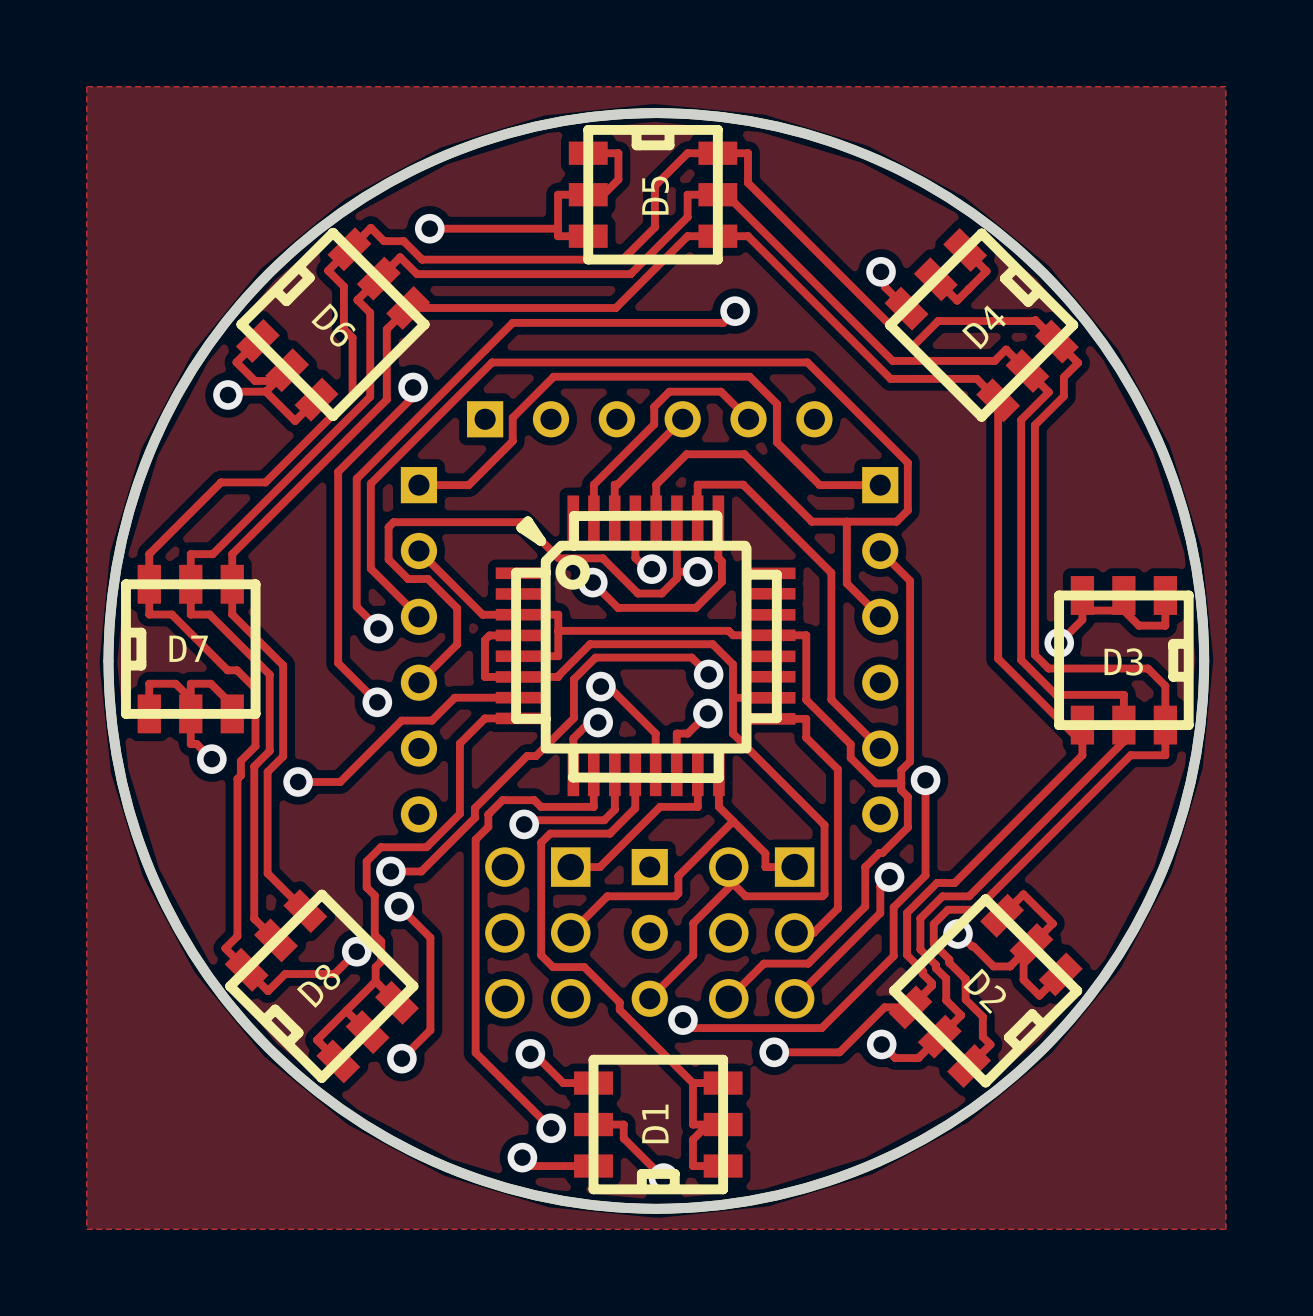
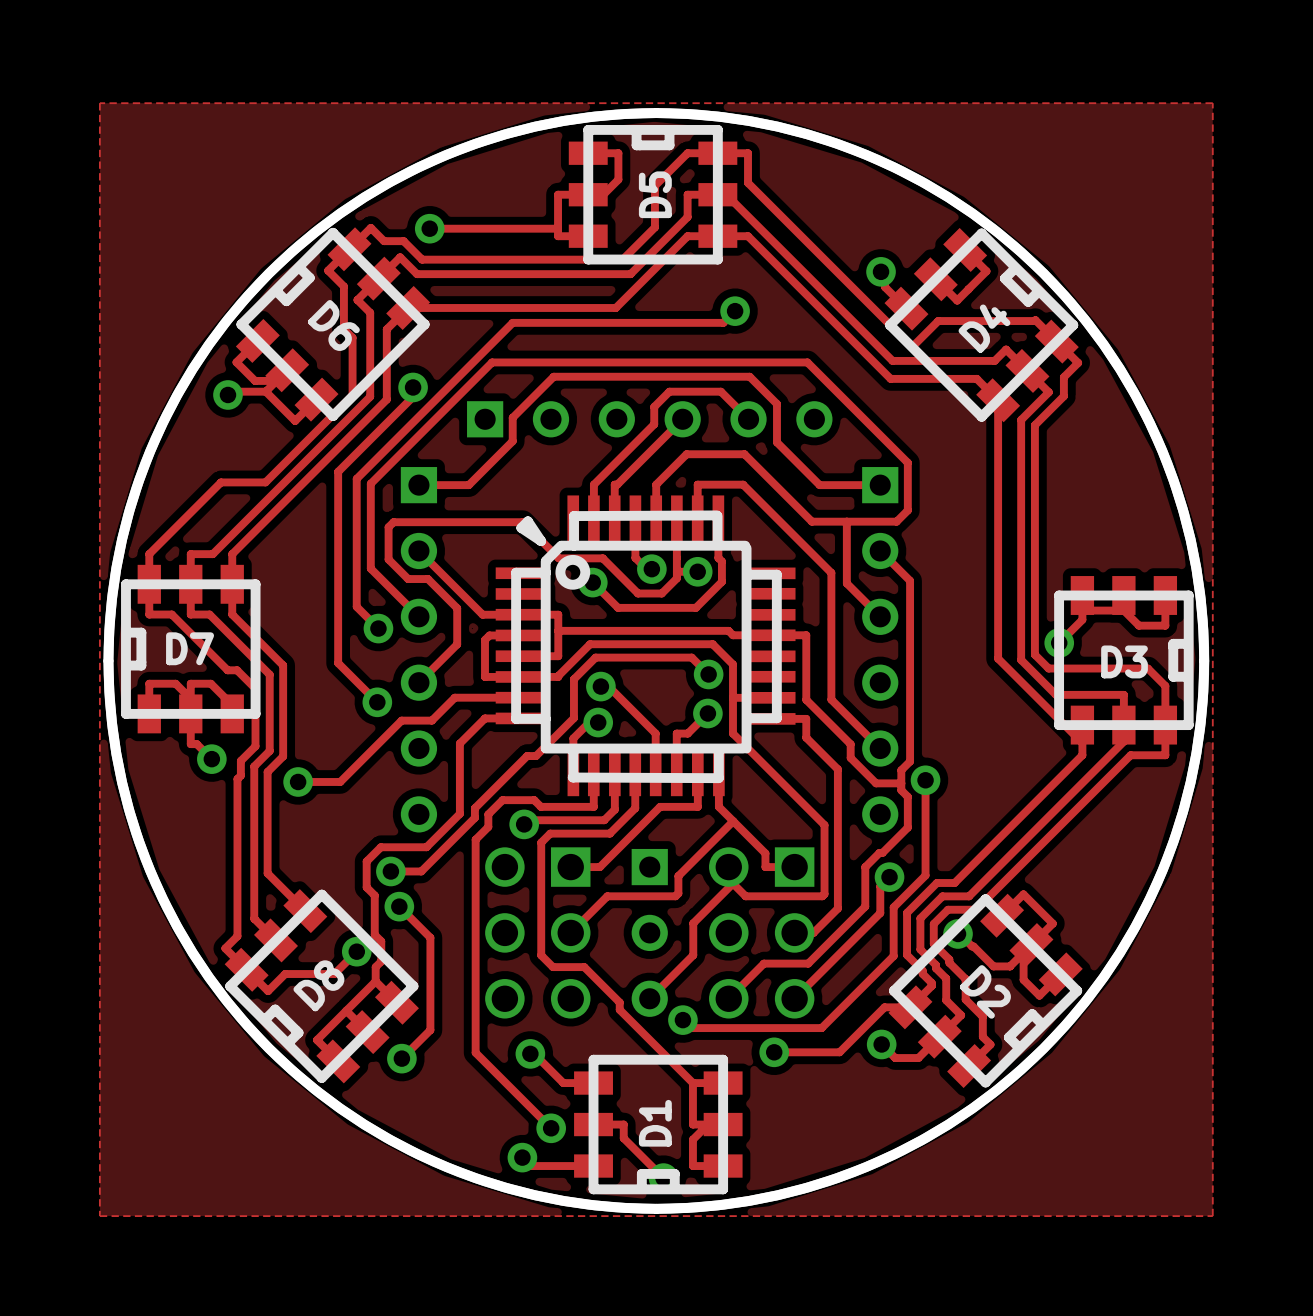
zone outline: (86, 86) (1225, 86) (1225, 1229) (86, 1229) (86, 86) -> (99, 103) (99, 1216) (1212, 1216) (1212, 103) (99, 103)

